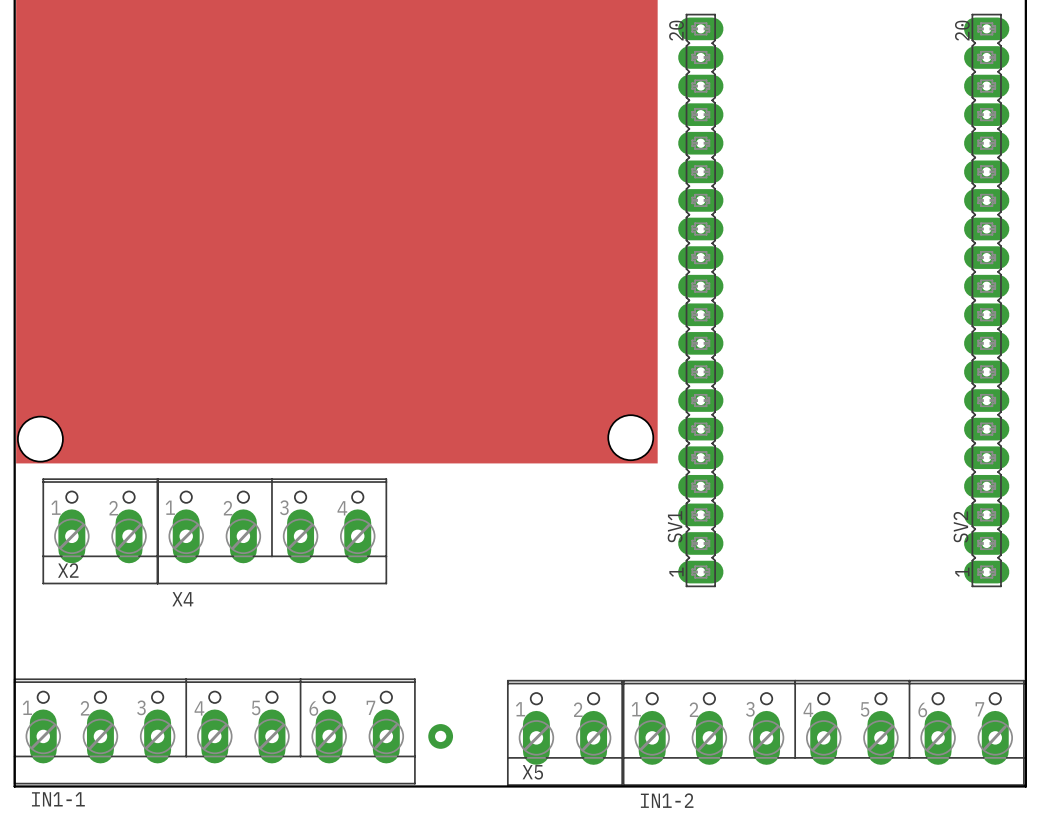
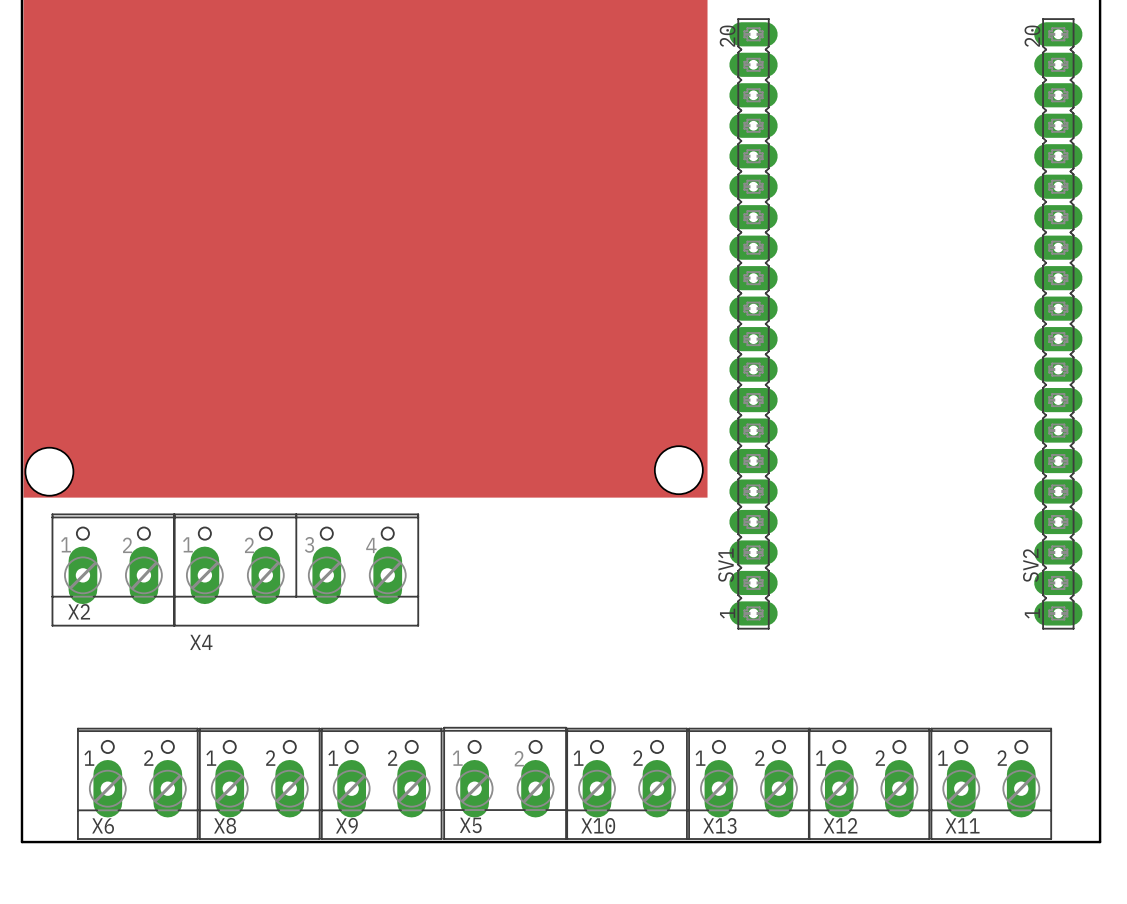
X6: none -> (137, 783)
IN1-1: (214, 731) -> none
X8: none -> (259, 783)
X9: none -> (381, 783)
X10: none -> (627, 783)
X13: none -> (748, 783)
X12: none -> (869, 783)
X11: none -> (991, 783)
X5 position: (565, 732) -> (505, 783)
IN1-2: (823, 732) -> none
via: (440, 736) -> none

